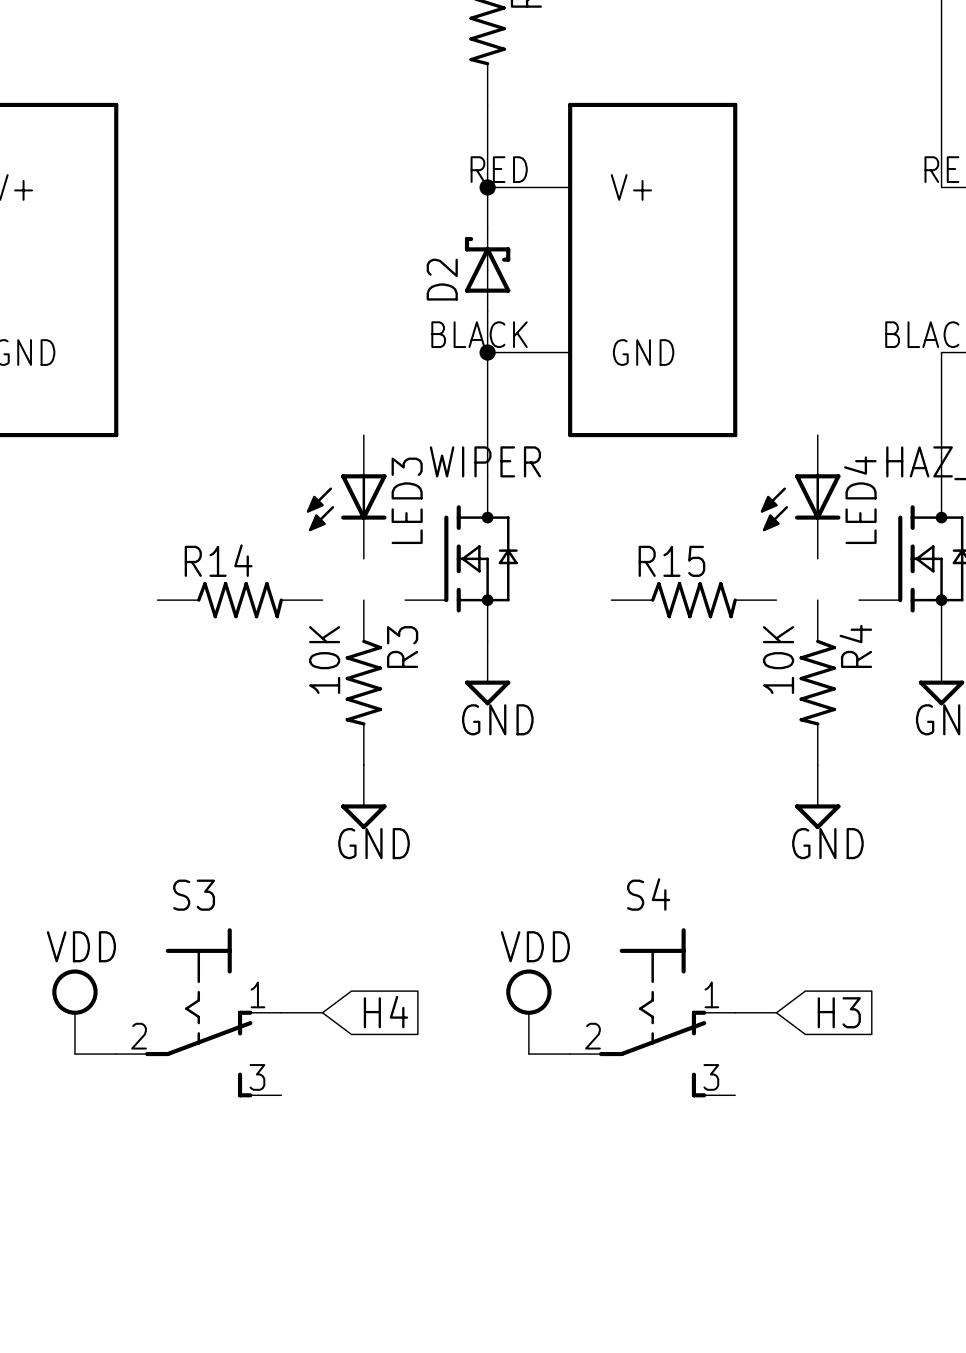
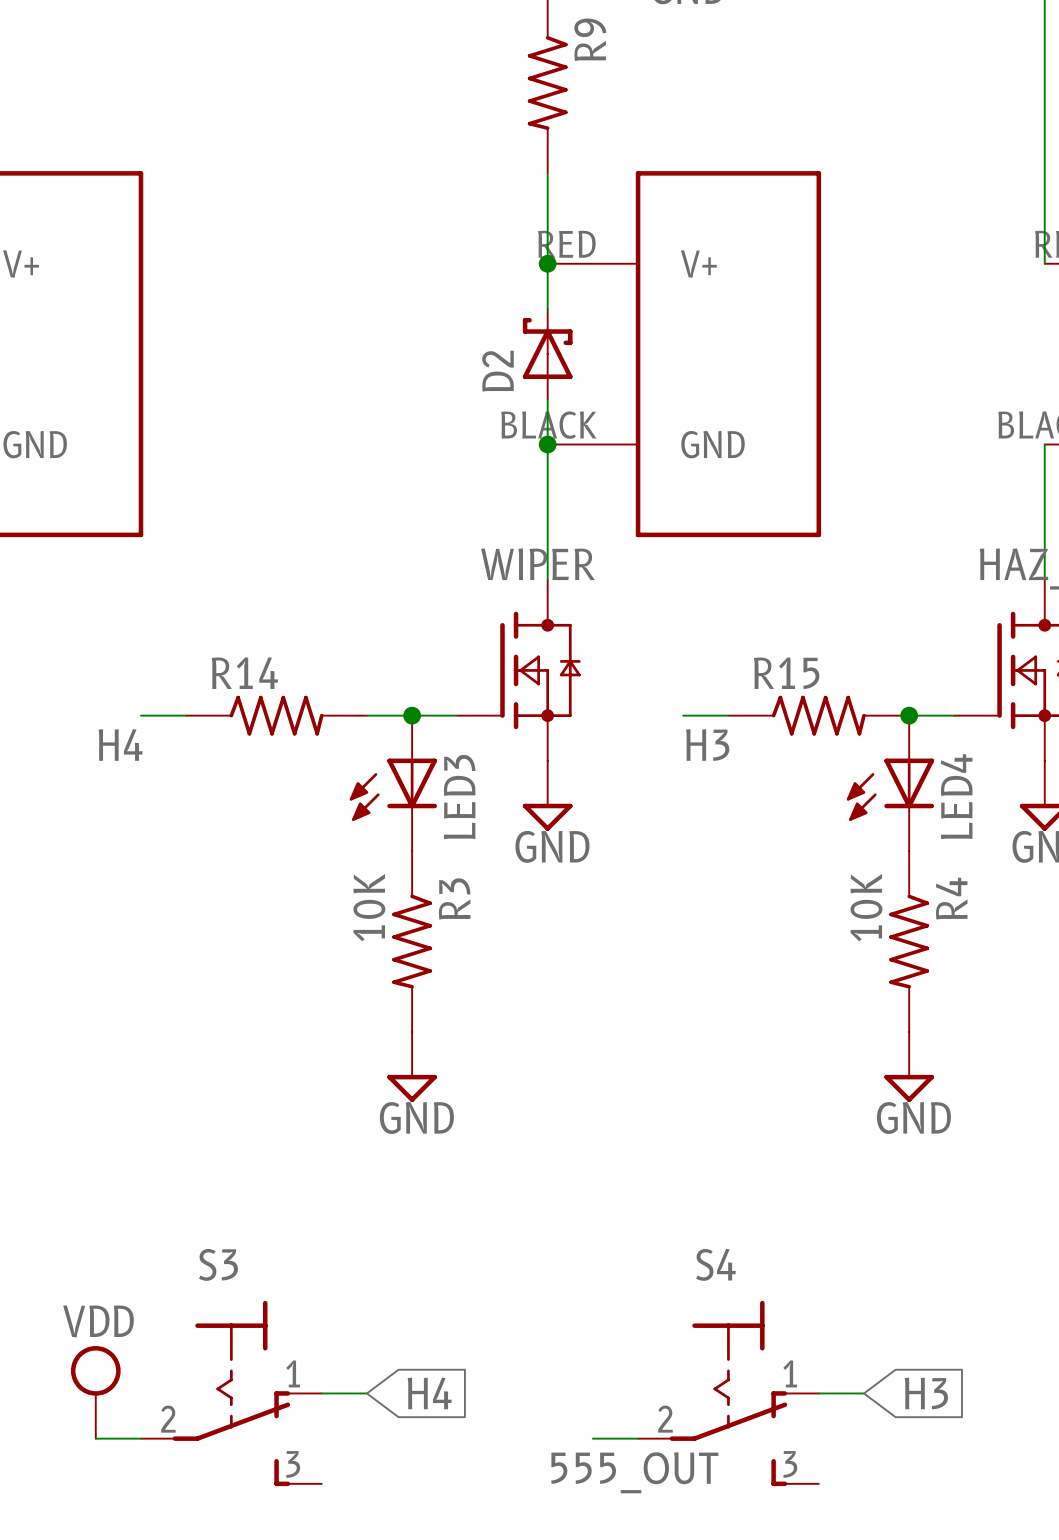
LED3 position: (346, 496) -> (393, 783)
LED4 position: (800, 496) -> (890, 783)
wire: none -> (140, 715) (186, 715)
wire: none -> (366, 715) (457, 715)
junction: none -> (412, 715)
R15 position: (693, 600) -> (818, 715)
wire: none -> (909, 715) (954, 715)
junction: none -> (909, 715)
label: none -> H4 (120, 745)
label: none -> H3 (707, 745)
R3 position: (363, 682) -> (412, 941)
R4 position: (817, 682) -> (909, 941)
power symbol position: GND (363, 797) -> GND (412, 1066)
power symbol position: GND (817, 797) -> GND (909, 1066)
power symbol position: VDD (74, 1011) -> VDD (95, 1392)
power symbol: VDD (528, 1011) -> none
S3 position: (198, 1012) -> (231, 1393)
wire: (281, 1012) (322, 1012) -> (321, 1393) (366, 1393)
global label position: H4 (385, 1012) -> H4 (429, 1393)
S4 position: (652, 1012) -> (728, 1393)
wire: (735, 1012) (776, 1012) -> (818, 1393) (864, 1393)
global label position: H3 (839, 1012) -> H3 (926, 1393)
wire: (74, 1054) (116, 1054) -> (95, 1438) (140, 1438)
wire: (528, 1054) (570, 1054) -> (592, 1438) (638, 1438)
label: none -> 555_OUT (634, 1472)

